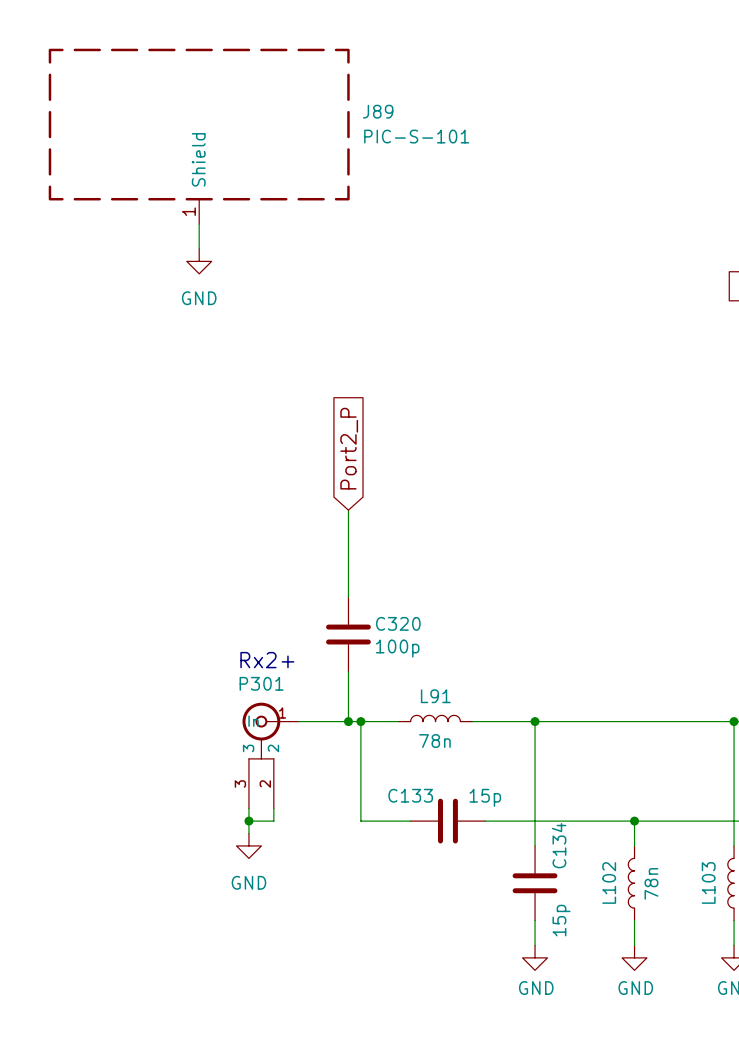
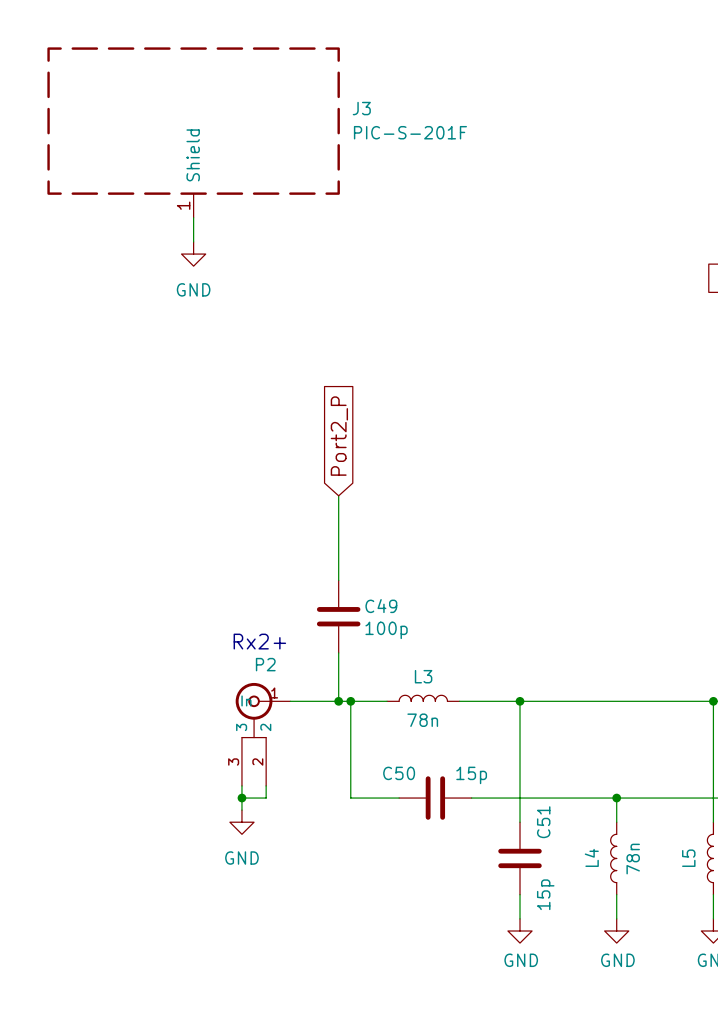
J89 name: J89 (378, 111) -> J3 (361, 108)
J89 value: PIC-S-101 (416, 136) -> PIC-S-201F (410, 132)
C320 name: C320 (398, 623) -> C49 (381, 606)
P301 name: P301 (261, 683) -> P2 (265, 664)
L91 name: L91 (435, 696) -> L3 (423, 676)
C133 name: C133 (410, 795) -> C50 (399, 773)
C134 name: C134 (559, 845) -> C51 (543, 822)
L102 name: L102 (609, 882) -> L4 (591, 857)
L103 name: L103 (708, 882) -> L5 (688, 858)

